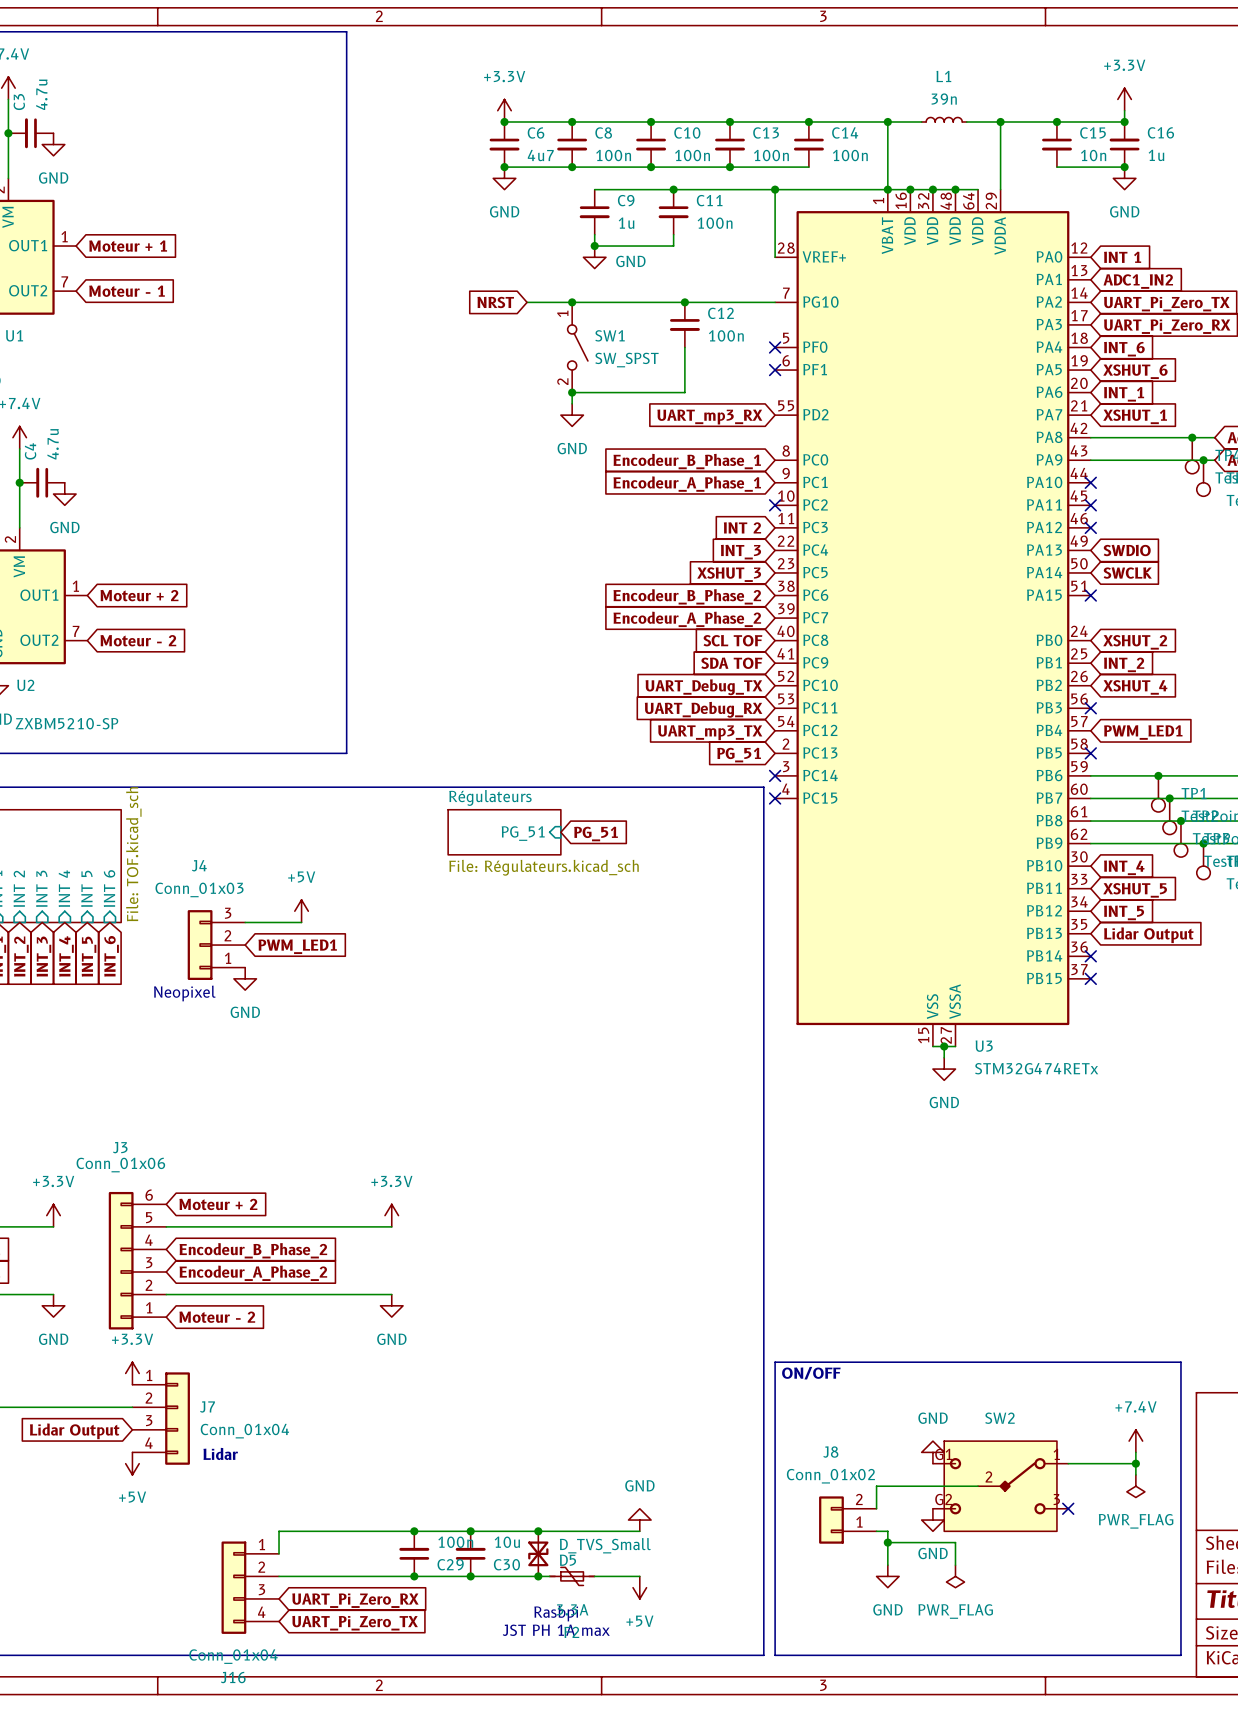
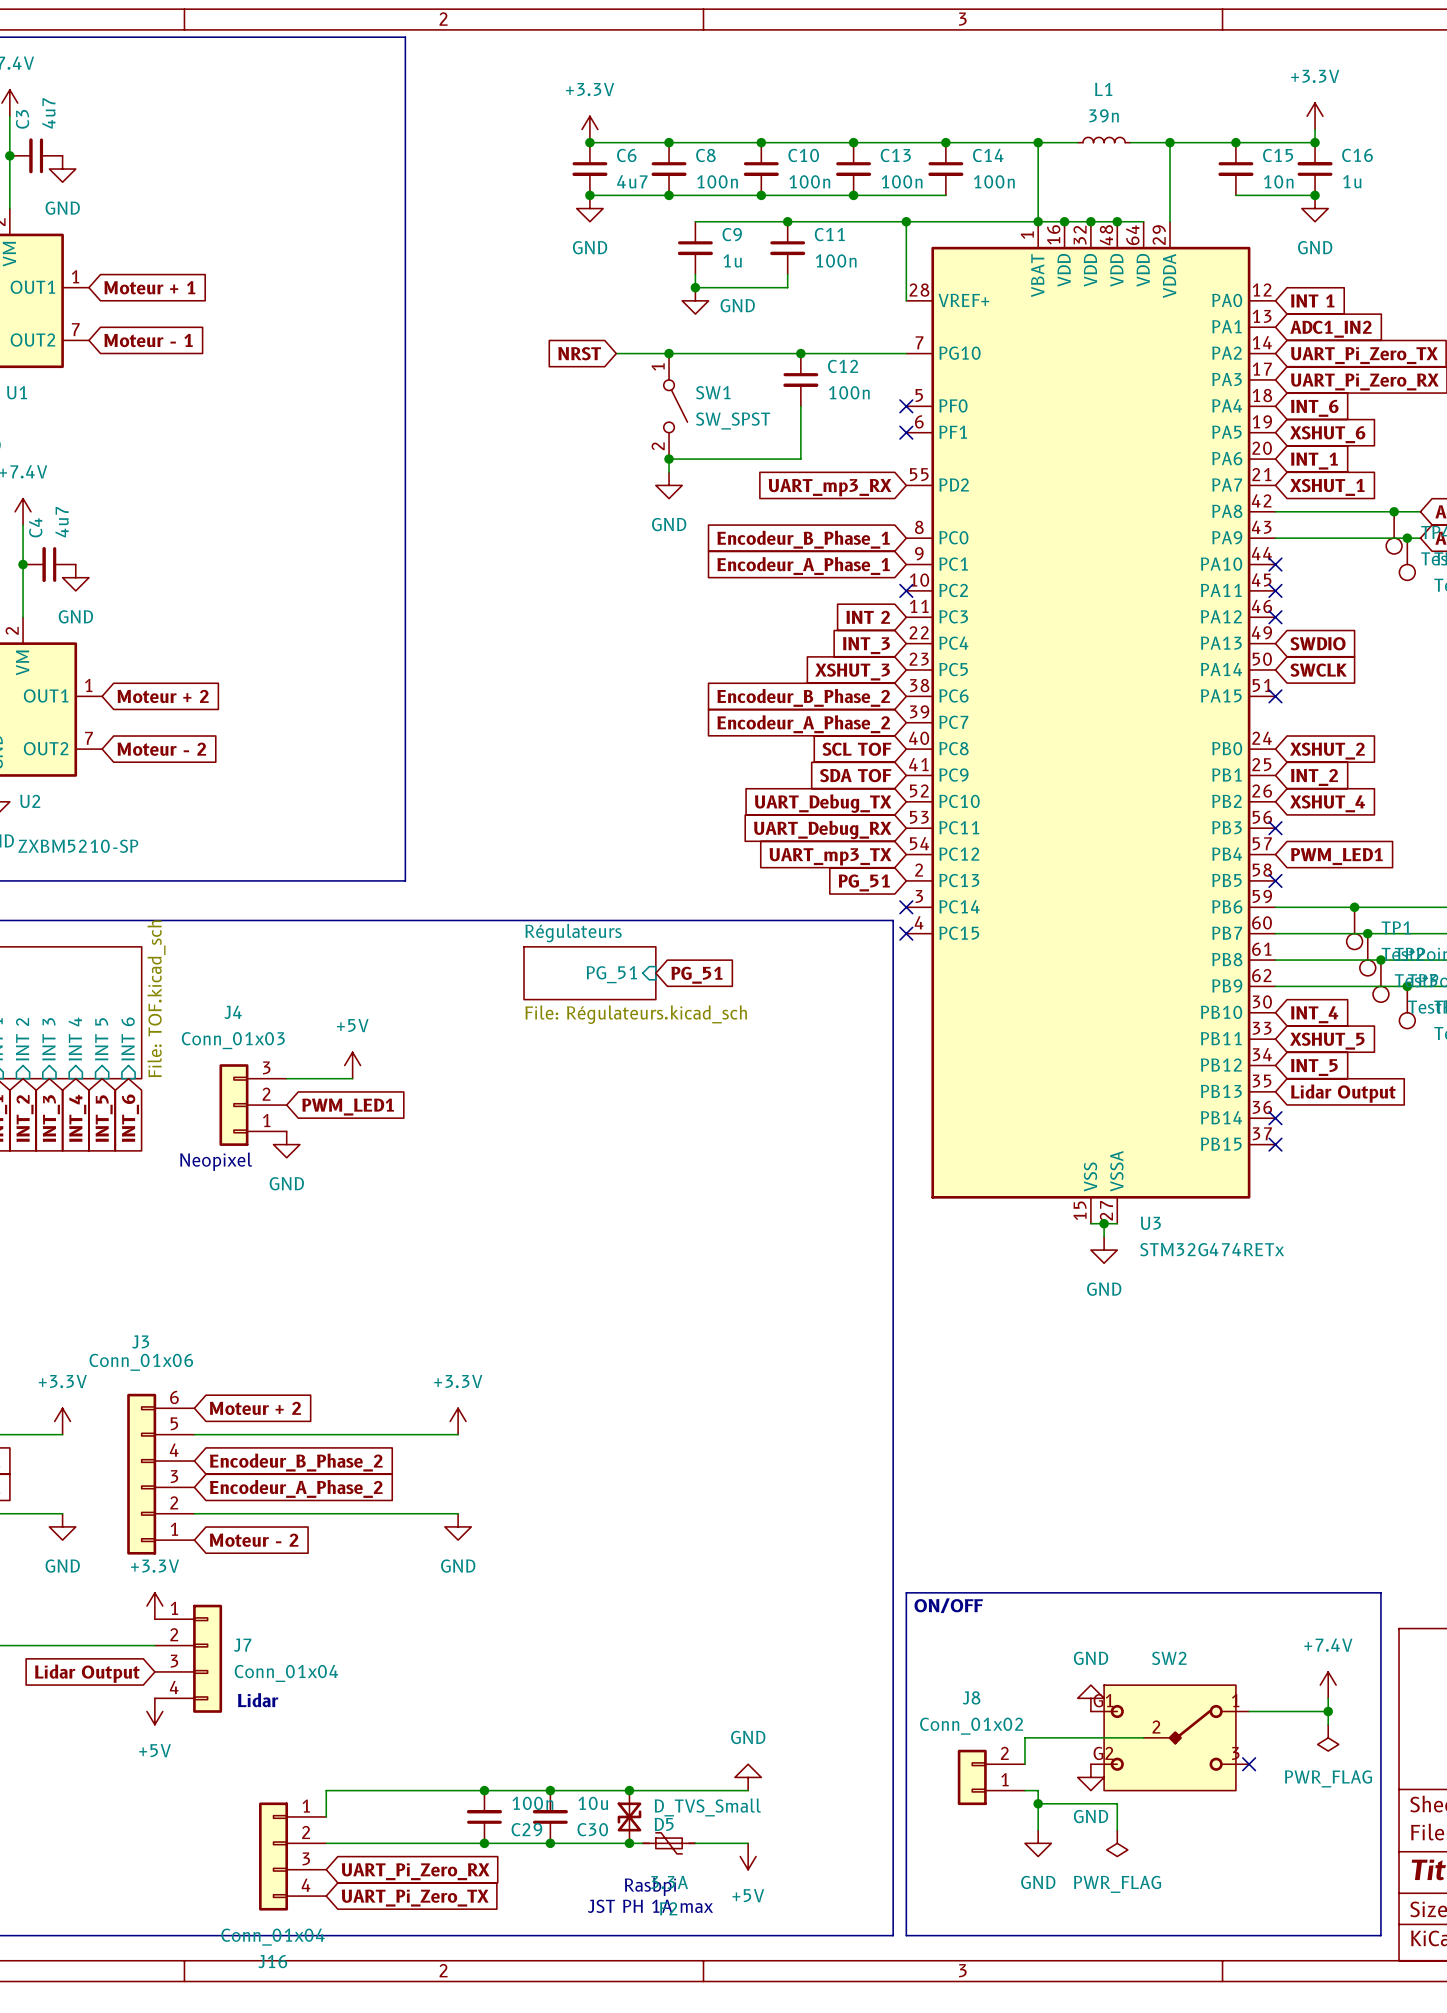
C3 value: 4.7u (41, 94) -> 4u7 (48, 113)
C4 value: 4.7u (53, 444) -> 4u7 (62, 522)

